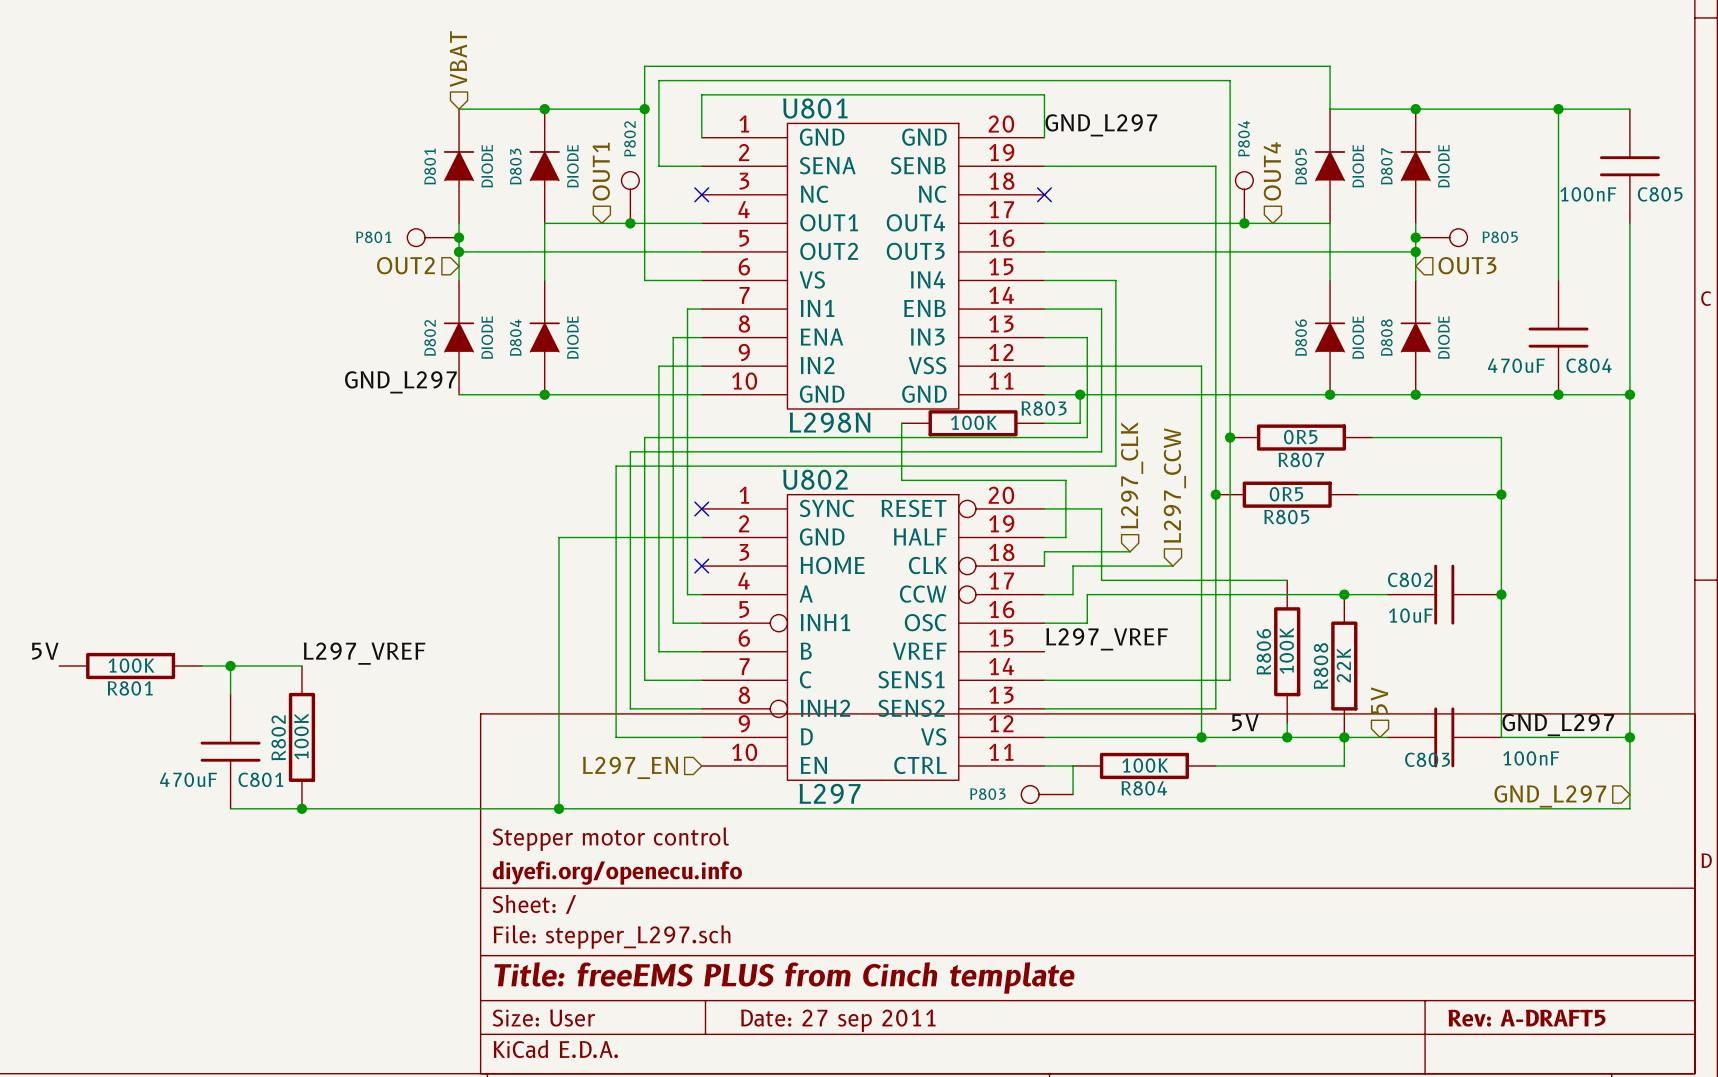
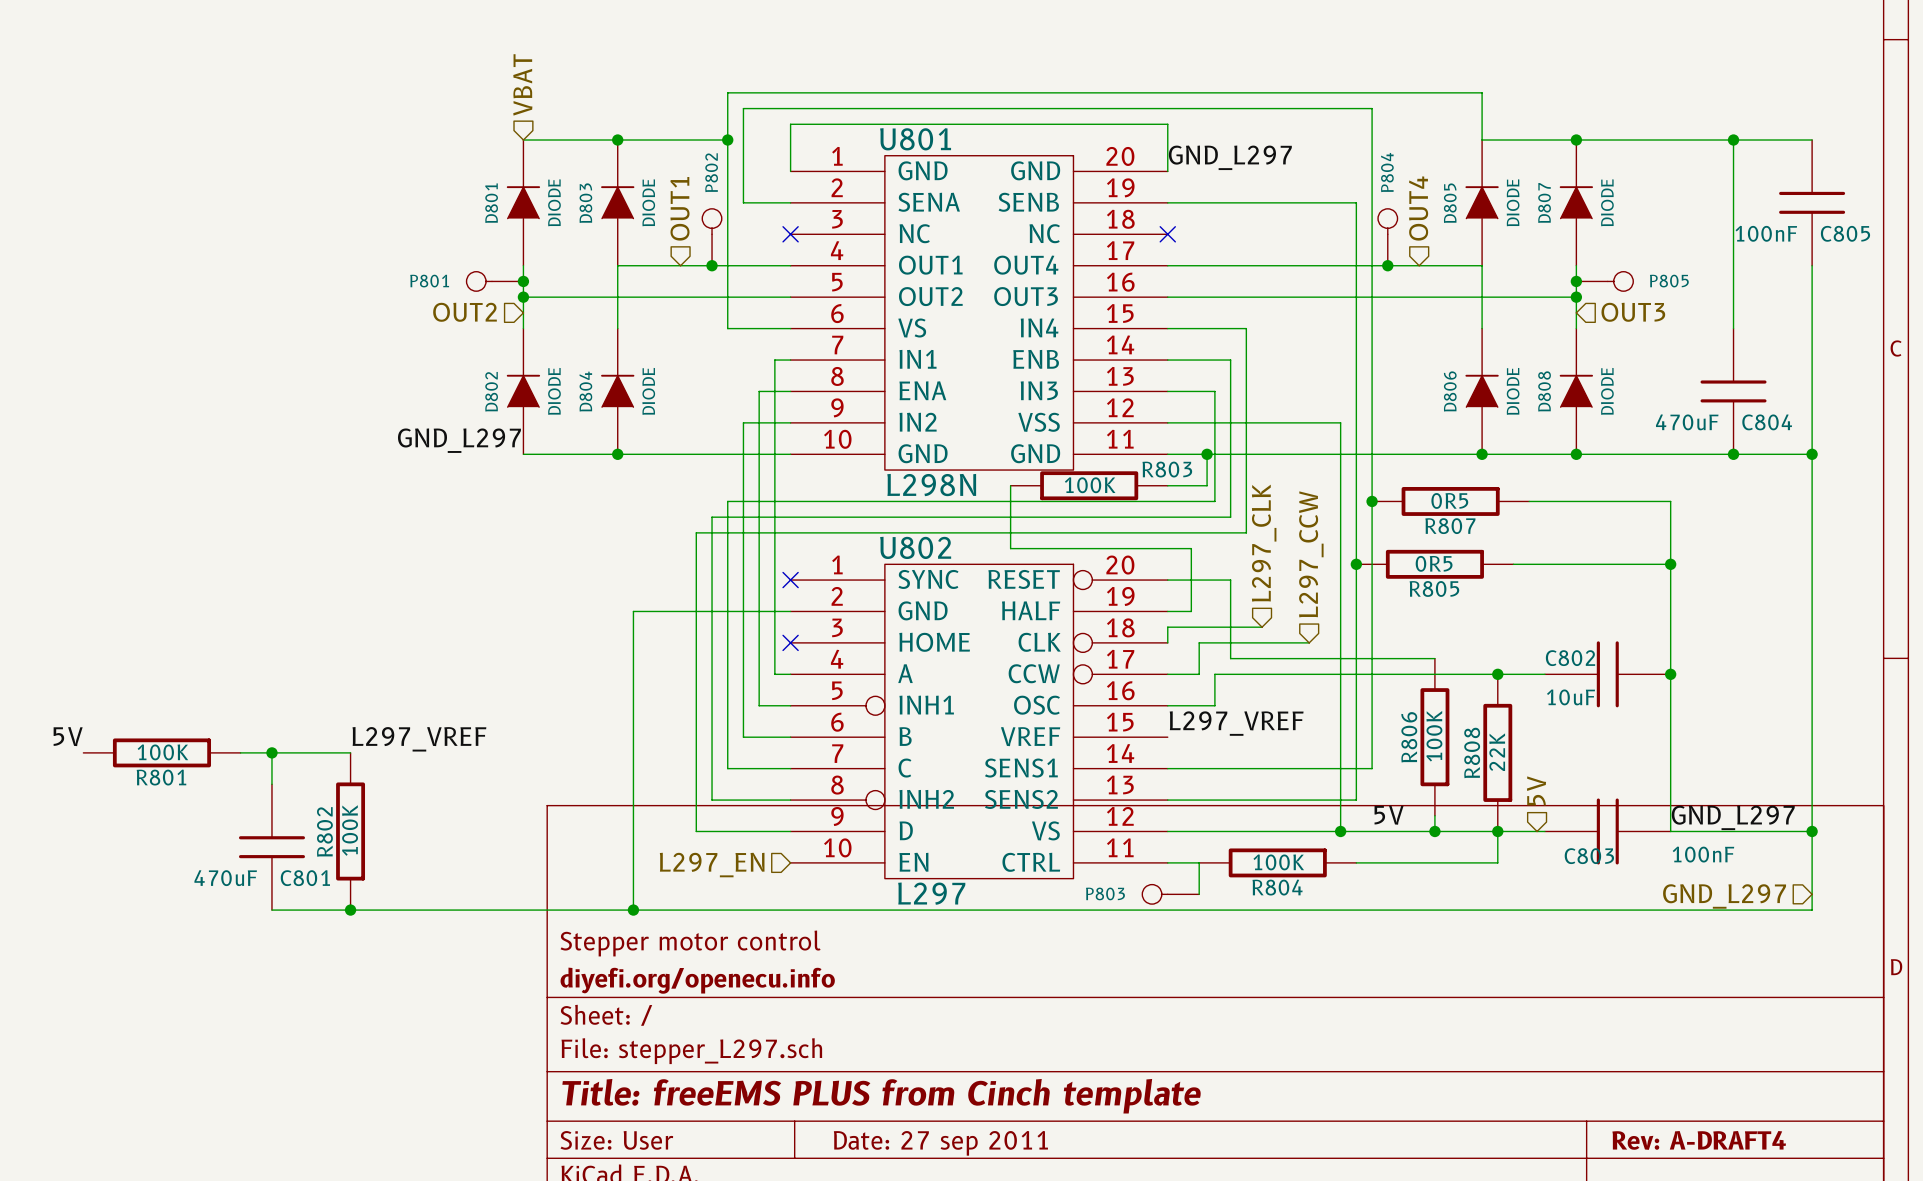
title block: Rev: A-DRAFT5 (1526, 1018) -> Rev: A-DRAFT4 (1699, 1140)

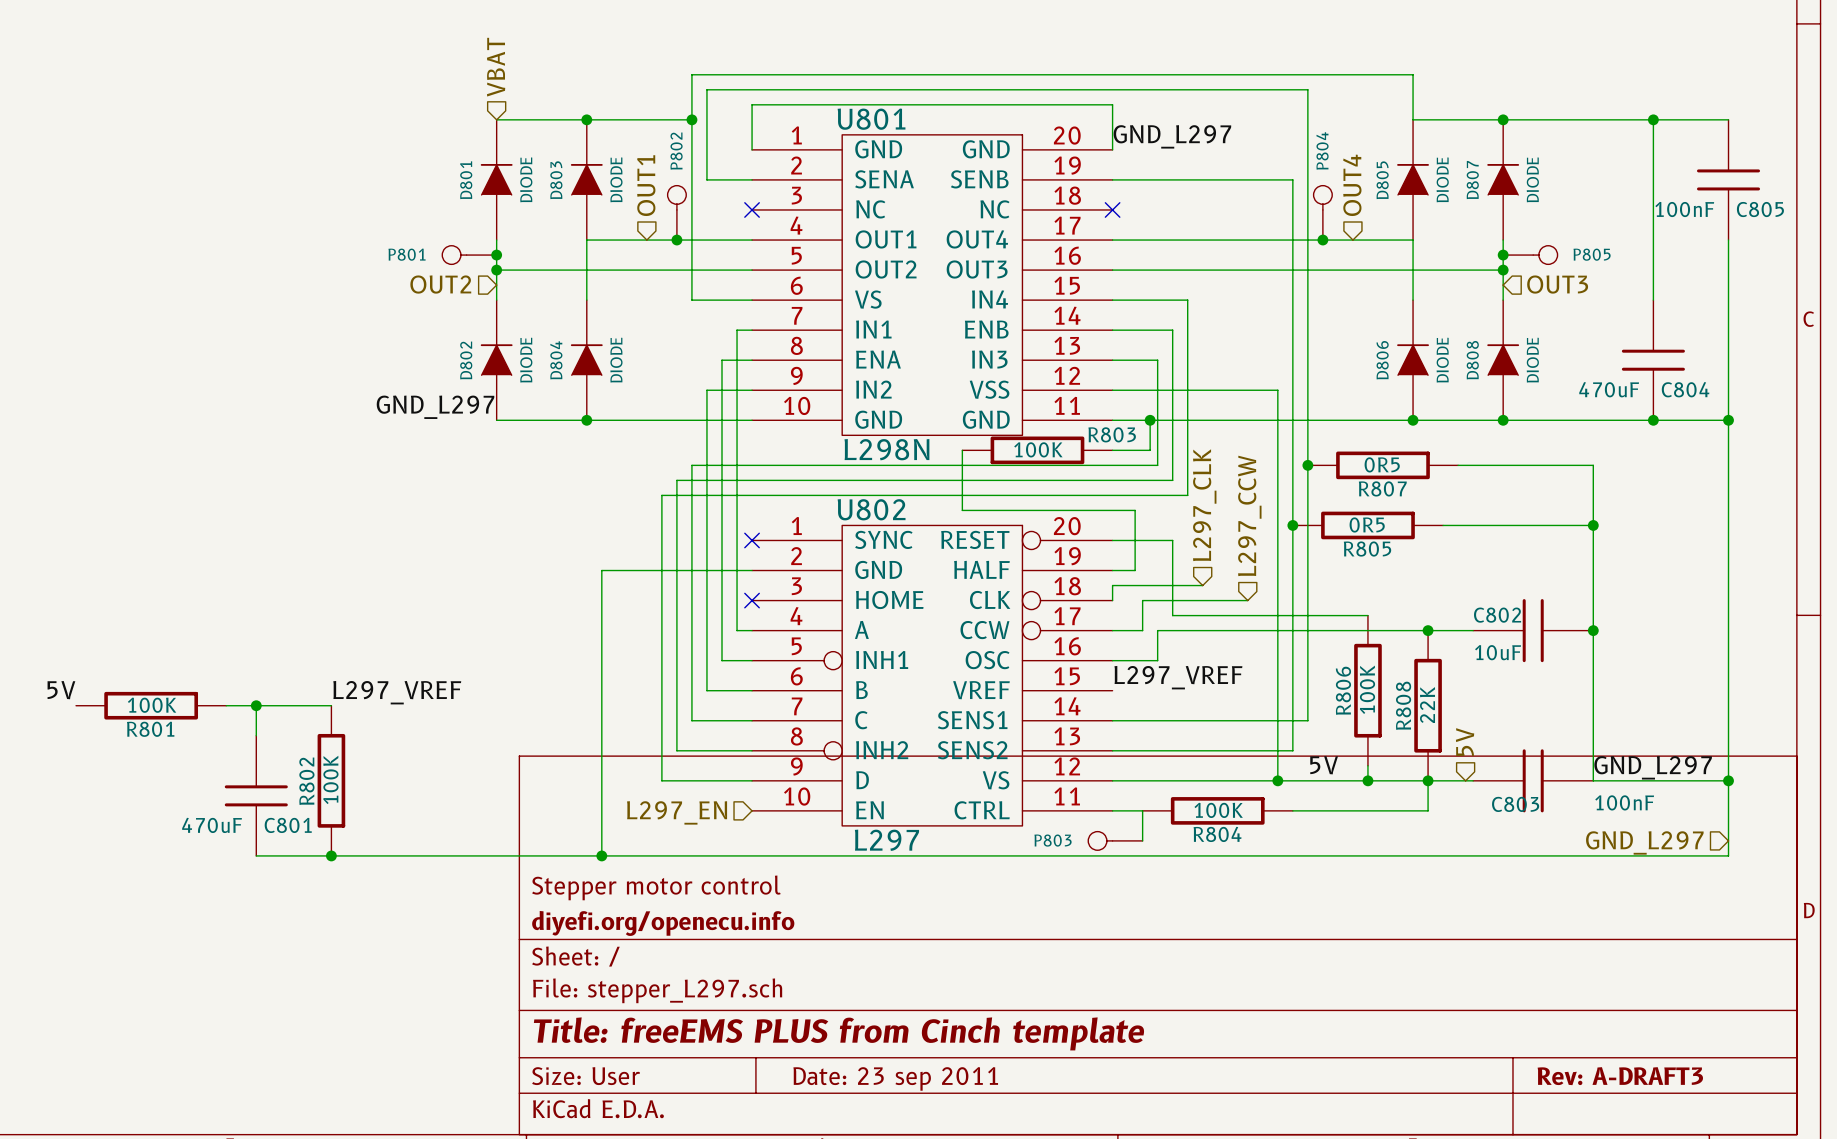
title block: Rev: A-DRAFT4 (1699, 1140) -> Rev: A-DRAFT3 (1620, 1076)
title block: Date: 27 sep 2011 (940, 1143) -> Date: 23 sep 2011 (895, 1078)

